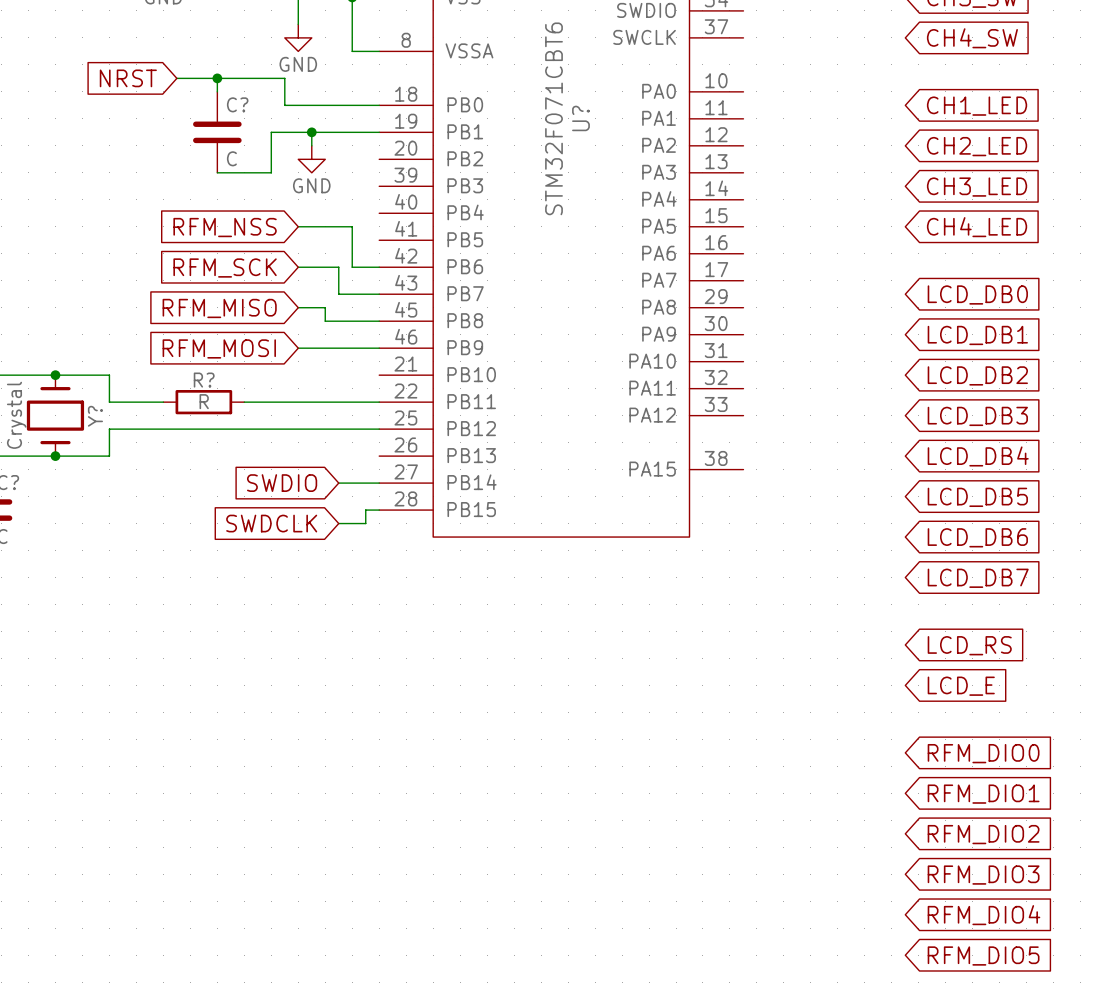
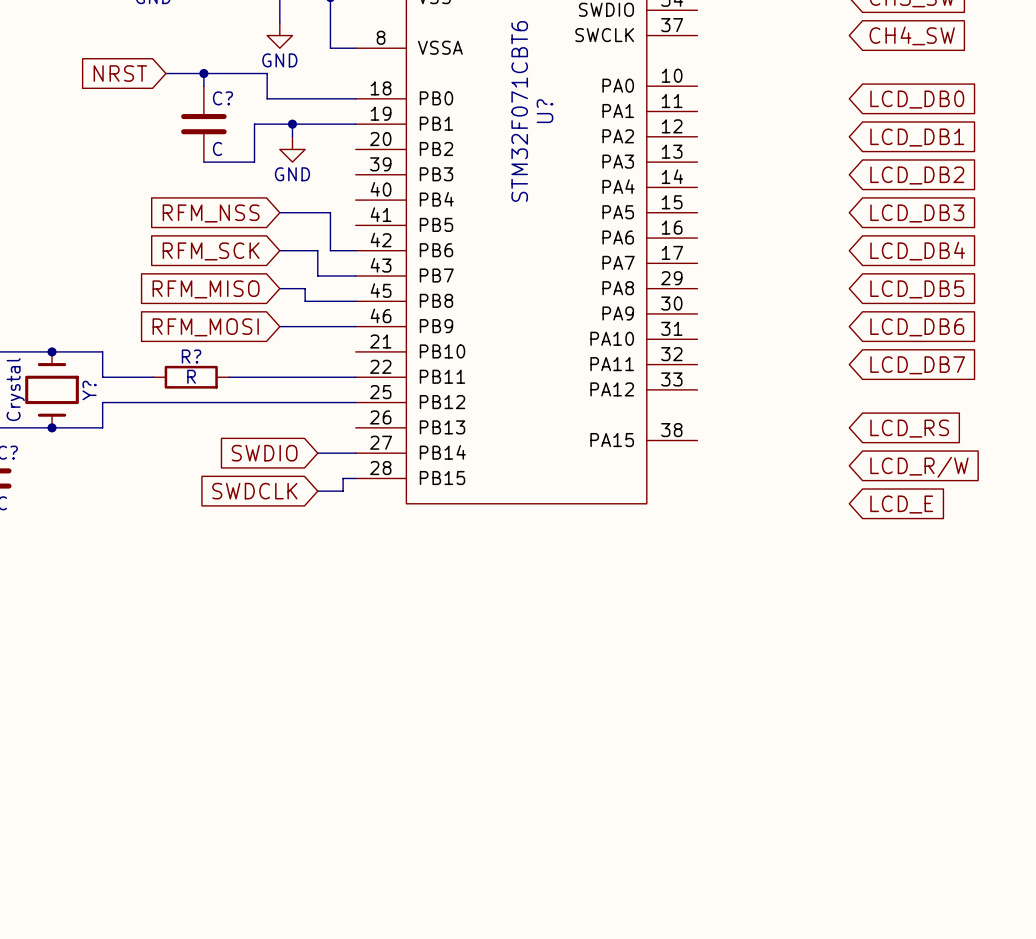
global label: CH1_LED (977, 106) -> LCD_DB0 (917, 99)
global label: CH2_LED (977, 146) -> LCD_DB1 (917, 137)
global label: CH3_LED (977, 187) -> LCD_DB2 (917, 175)
global label: CH4_LED (977, 227) -> LCD_DB3 (917, 213)
global label: none -> LCD_DB4 (917, 251)
global label: LCD_DB0 (977, 294) -> none
global label: none -> LCD_DB5 (917, 289)
global label: LCD_DB1 (977, 335) -> none
global label: none -> LCD_DB6 (917, 327)
global label: LCD_DB2 (977, 375) -> none
global label: LCD_DB3 (977, 416) -> none
global label: LCD_DB4 (978, 456) -> LCD_RS (909, 428)
global label: LCD_DB5 (977, 497) -> LCD_R/W (919, 467)
global label: LCD_DB6 (977, 537) -> LCD_E (901, 504)
global label position: LCD_DB7 (978, 578) -> LCD_DB7 (917, 365)
global label: LCD_RS (969, 645) -> none
global label: LCD_E (961, 686) -> none
global label: RFM_DIO0 (983, 753) -> none
global label: RFM_DIO1 (983, 794) -> none
global label: RFM_DIO2 (983, 834) -> none
global label: RFM_DIO3 (983, 875) -> none
global label: RFM_DIO4 (983, 915) -> none
global label: RFM_DIO5 (983, 956) -> none

